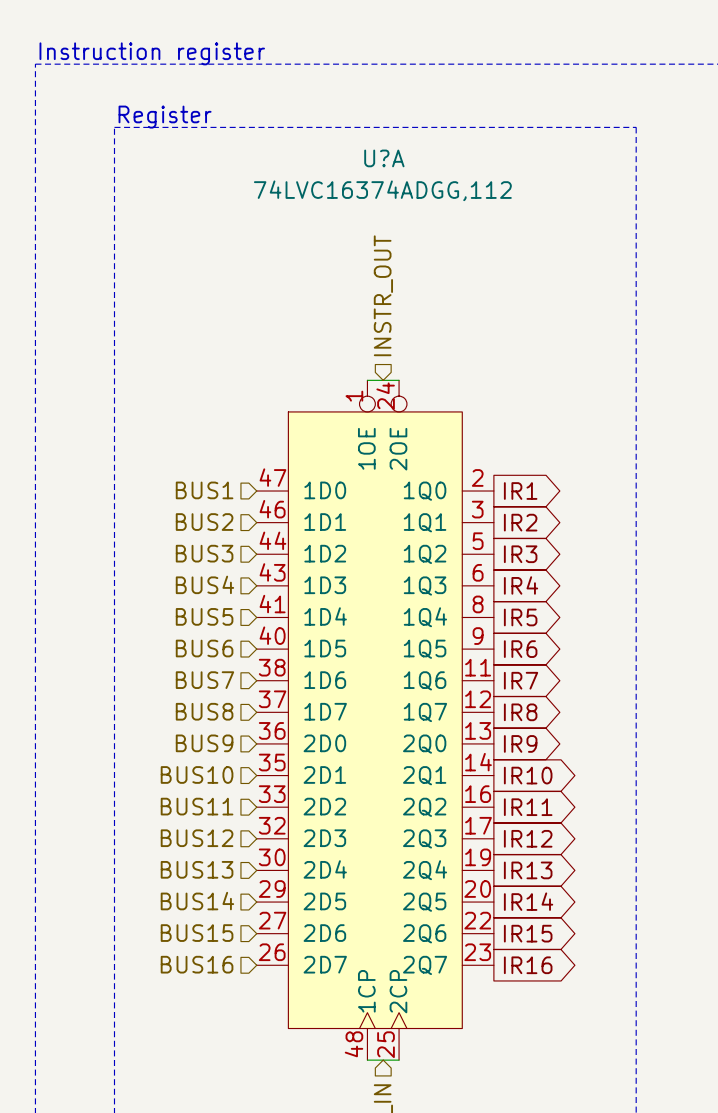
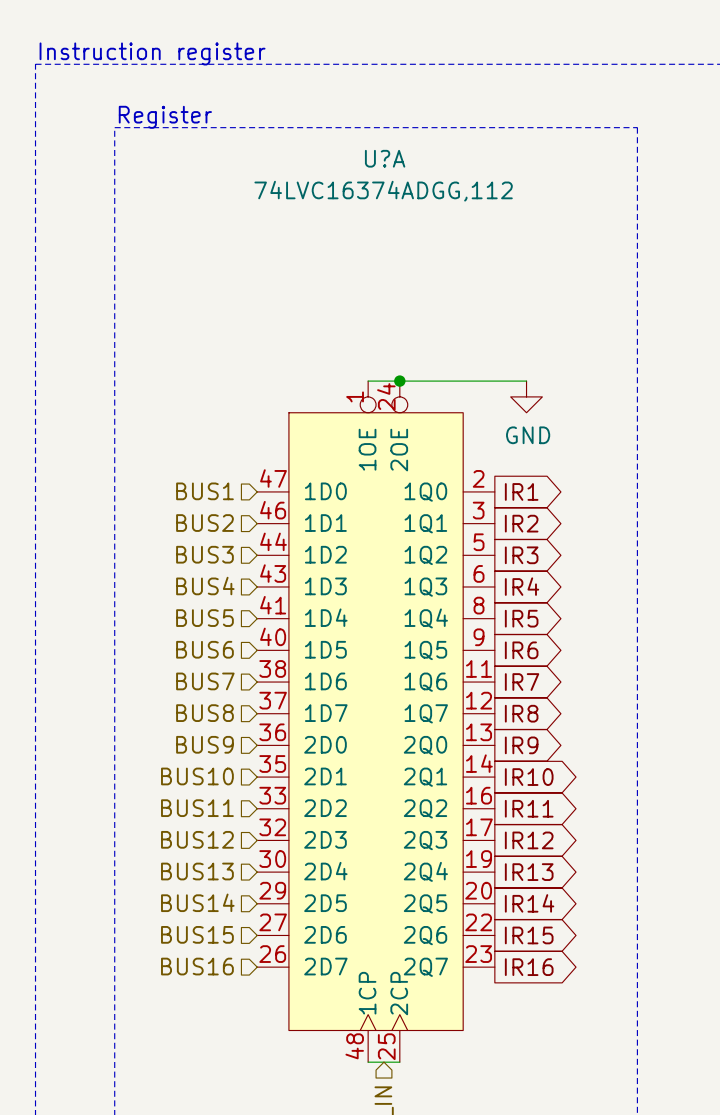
hierarchical label: INSTR_OUT (383, 295) -> none
wire: none -> (399, 381) (526, 381)
junction: none -> (399, 381)
power symbol: none -> GND (526, 396)

